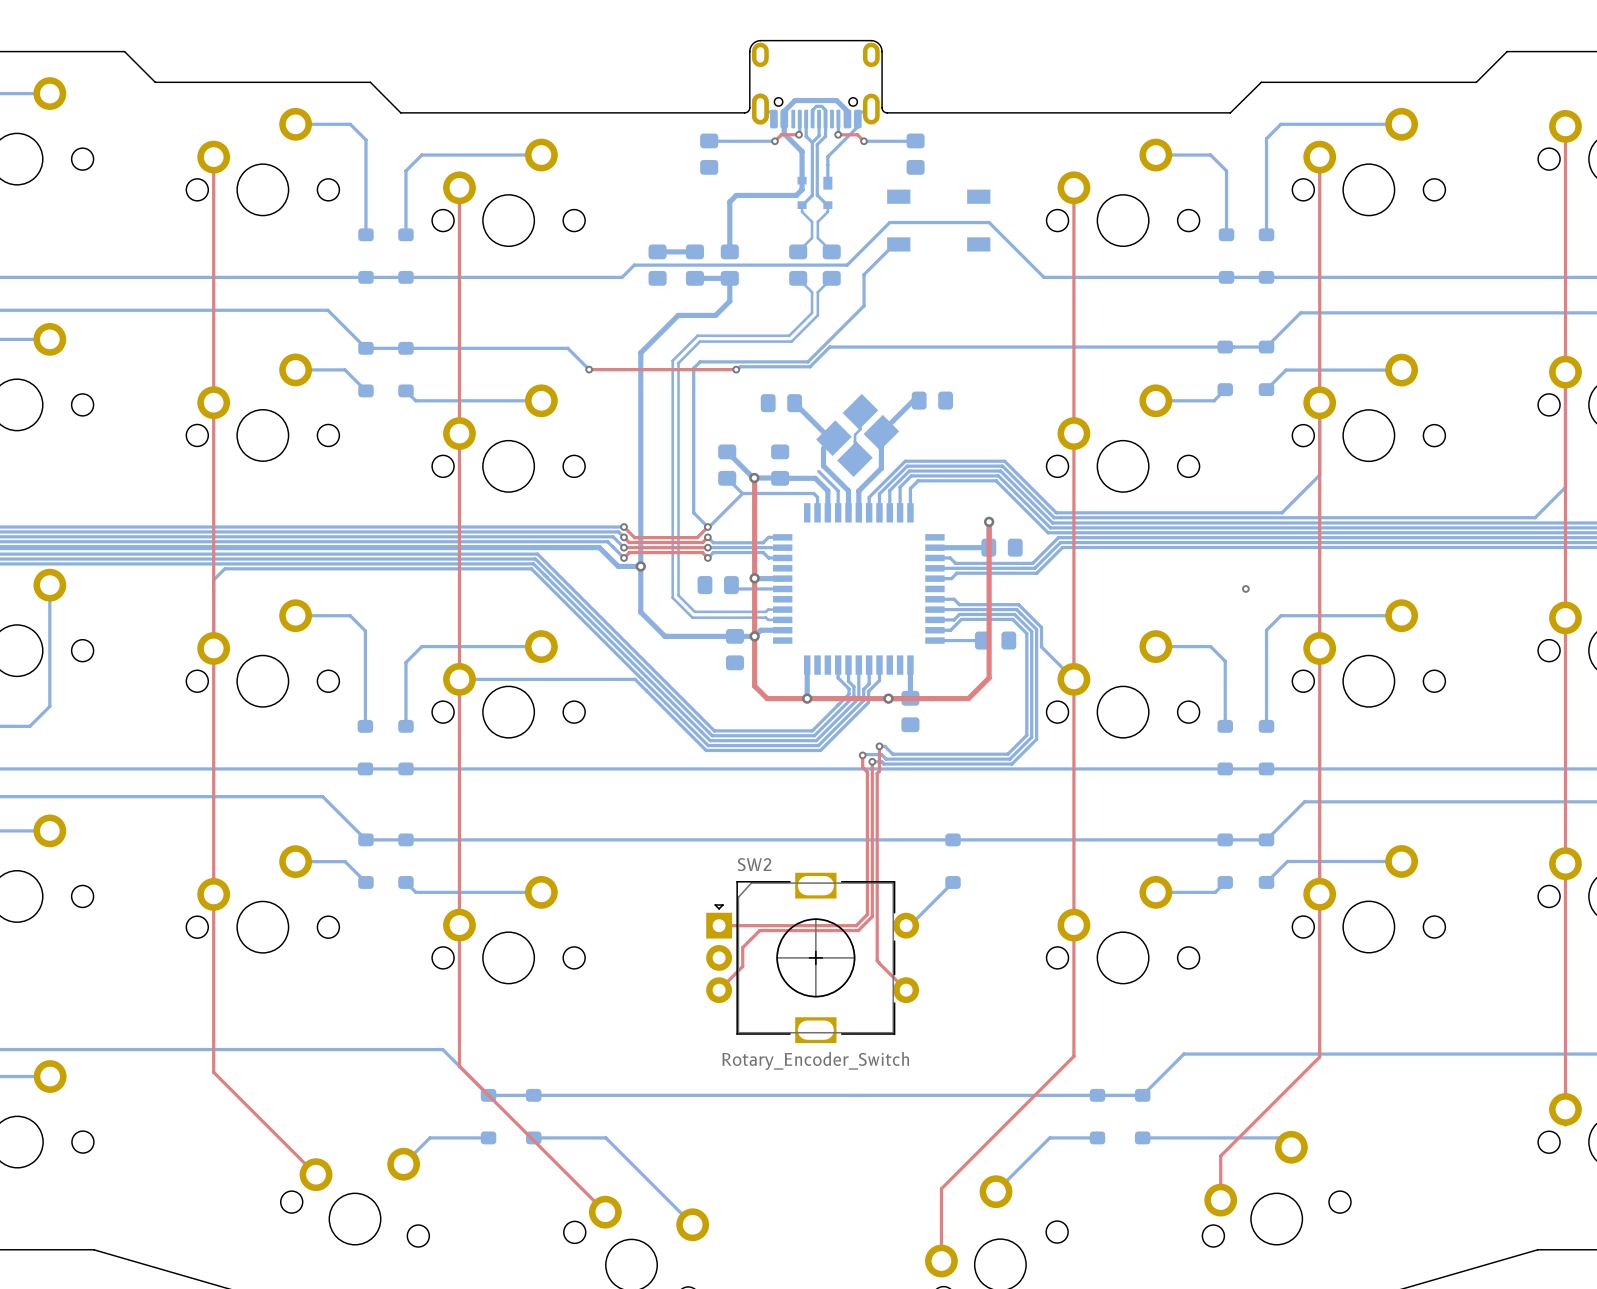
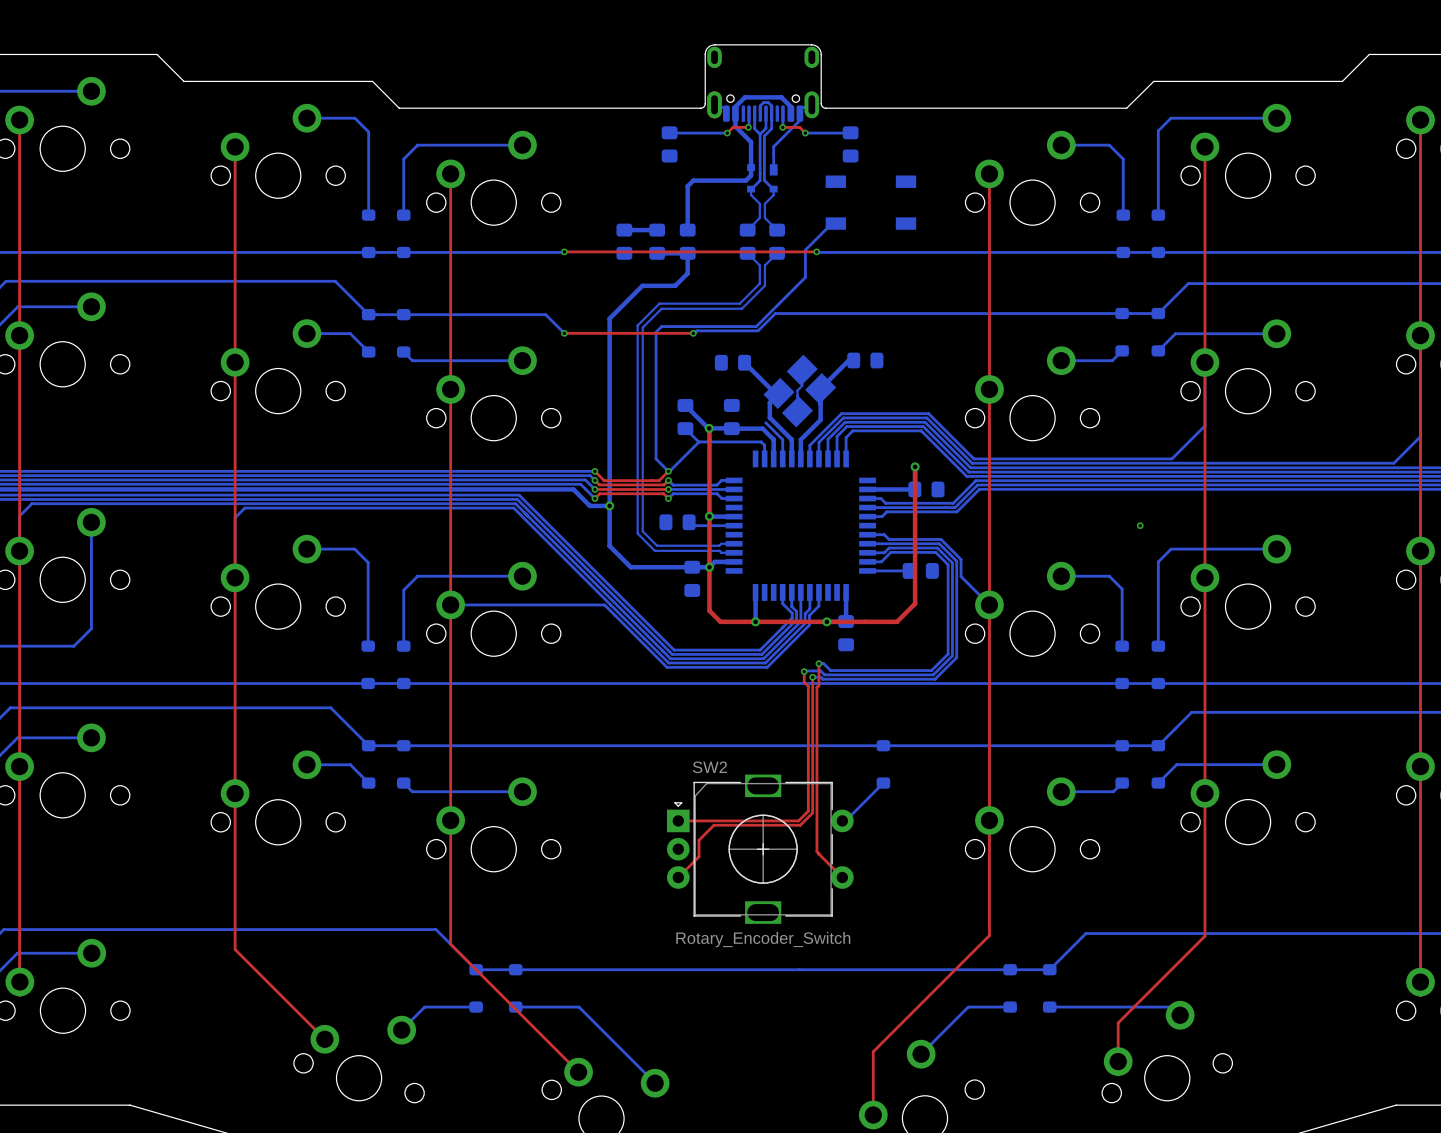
top track: none -> (564, 251) (816, 251)
via: none -> (564, 251)
via: none -> (816, 251)
bottom track: (588, 277) (622, 277) (634, 265) (847, 265) (889, 222) (989, 222) (1043, 277) -> (816, 251) (963, 252)

